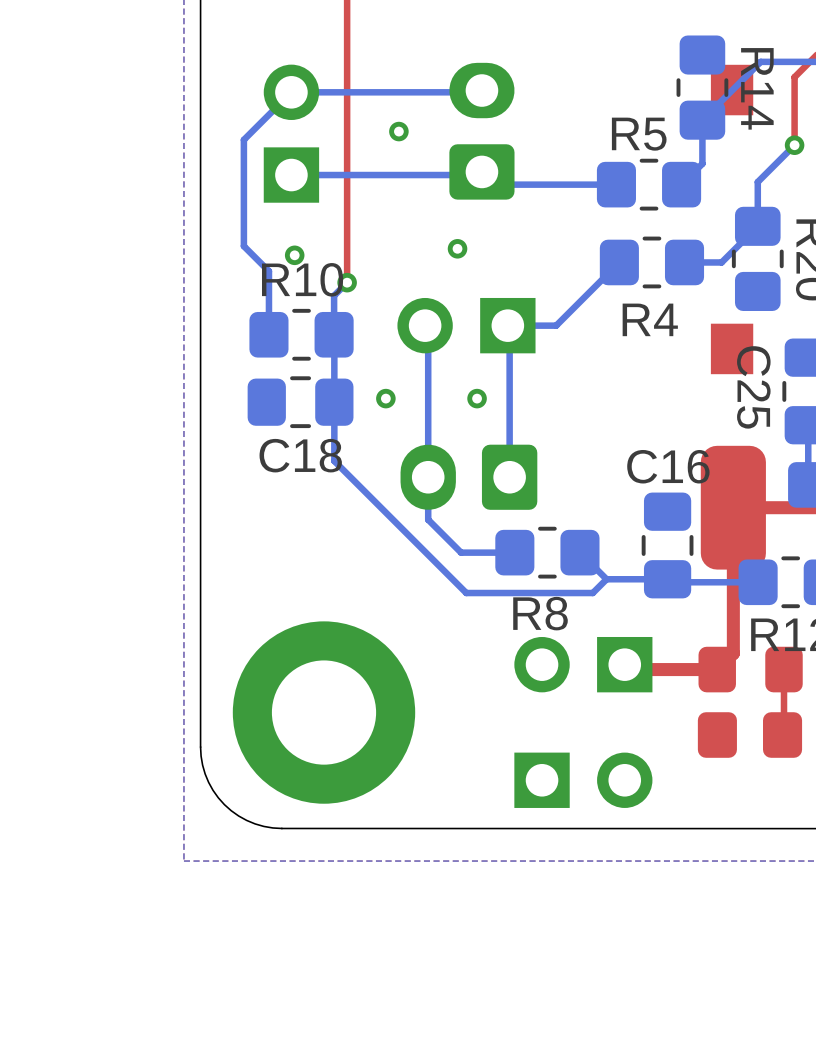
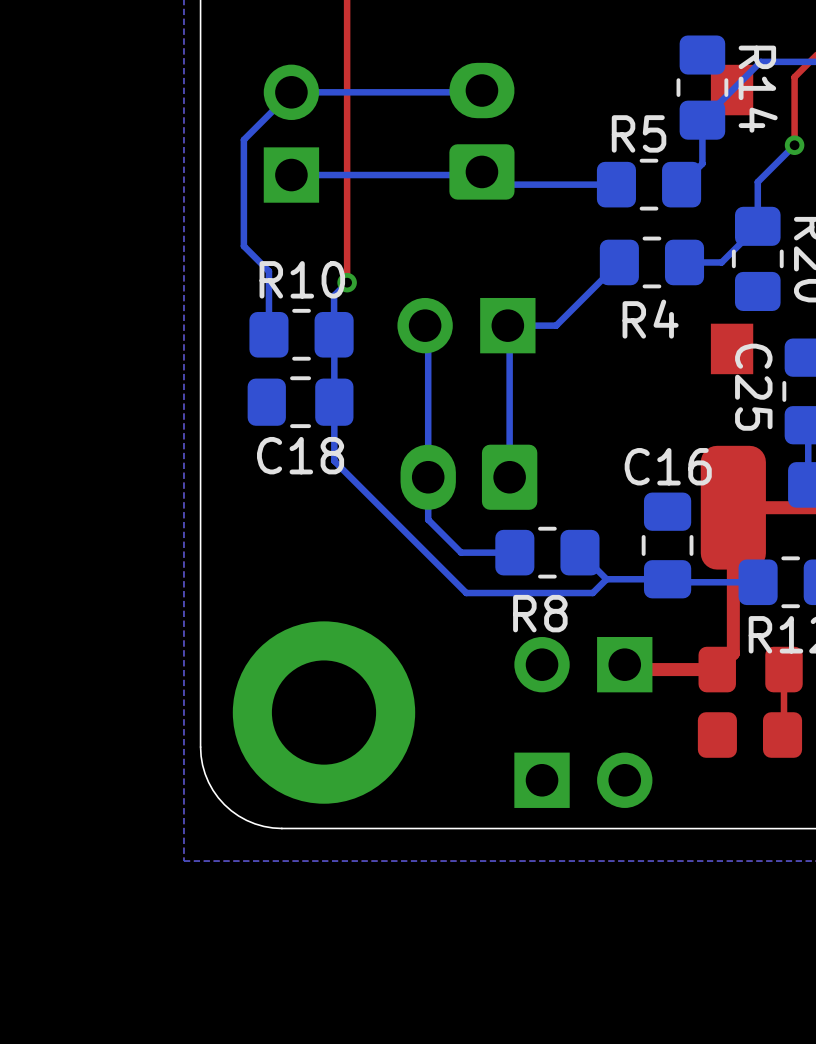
via: (398, 131) -> none
via: (457, 248) -> none
via: (294, 255) -> none
via: (385, 398) -> none
via: (477, 398) -> none

